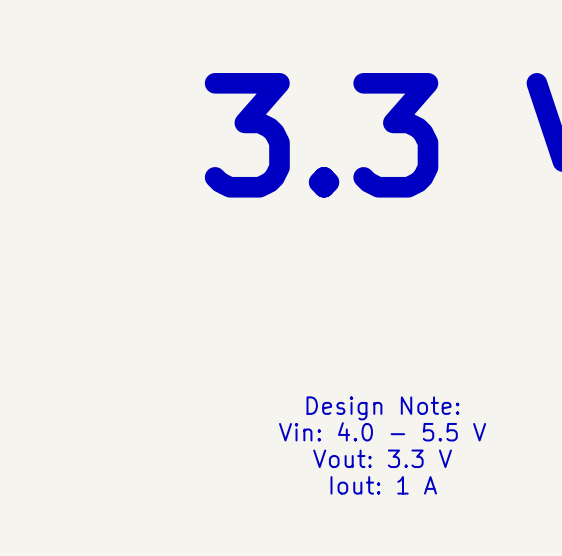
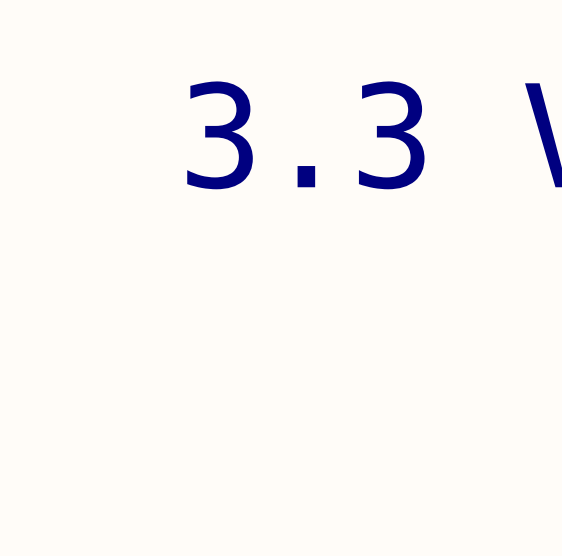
text: Design Note: (382, 408) -> none
text: Vin: 4.0 - 5.5 V (382, 431) -> none
text: Vout: 3.3 V (382, 458) -> none
text: Iout: 1 A (383, 485) -> none

